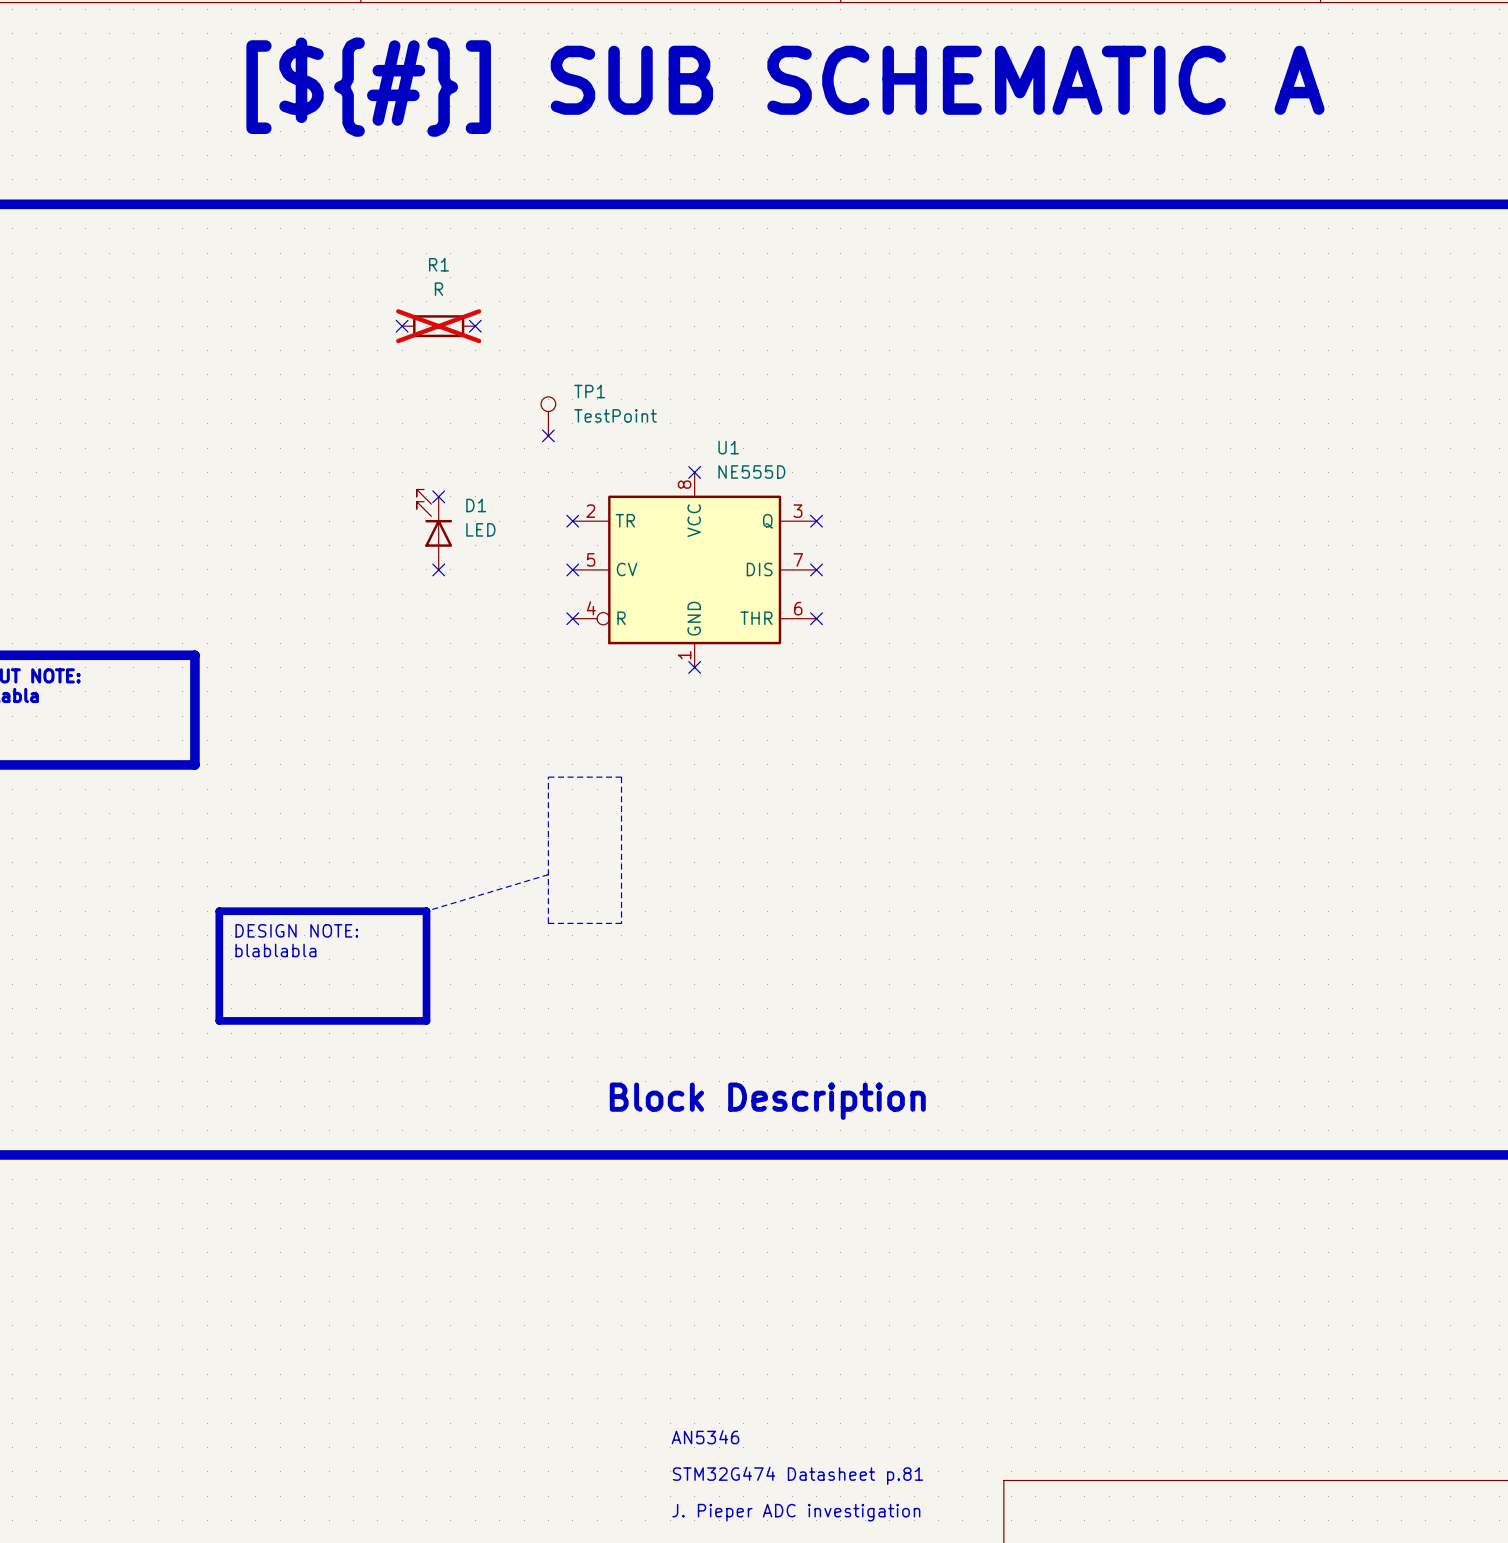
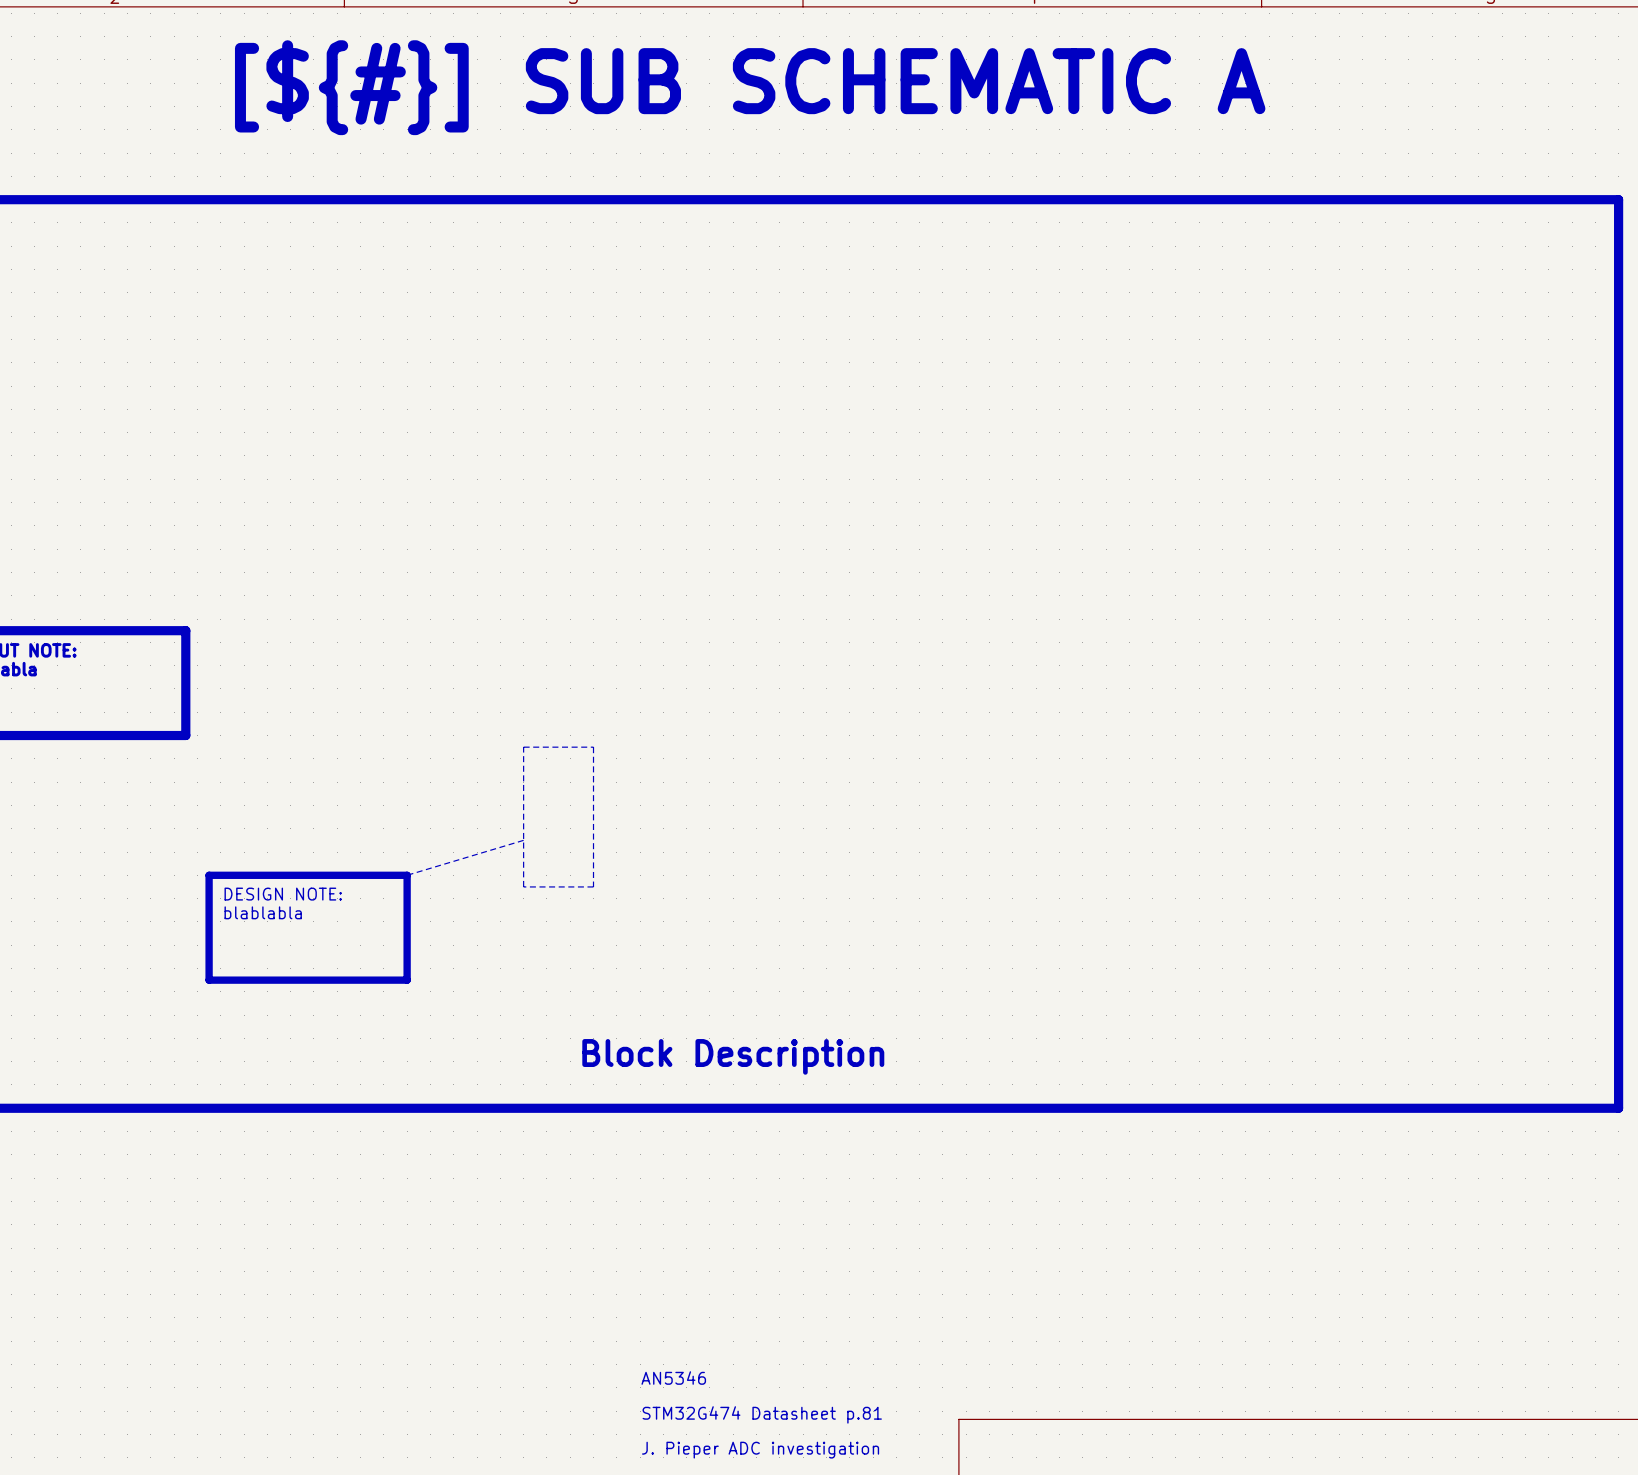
no-connect mark: (402, 326) -> none
R1: R (438, 326) -> none
no-connect mark: (475, 326) -> none
TP1: TestPoint (548, 416) -> none
no-connect mark: (548, 435) -> none
no-connect mark: (694, 472) -> none
no-connect mark: (438, 496) -> none
no-connect mark: (572, 521) -> none
no-connect mark: (816, 521) -> none
D1: LED (434, 529) -> none
no-connect mark: (438, 569) -> none
no-connect mark: (572, 569) -> none
U1: NE555D (694, 569) -> none
no-connect mark: (816, 569) -> none
no-connect mark: (572, 618) -> none
no-connect mark: (816, 618) -> none
no-connect mark: (694, 667) -> none

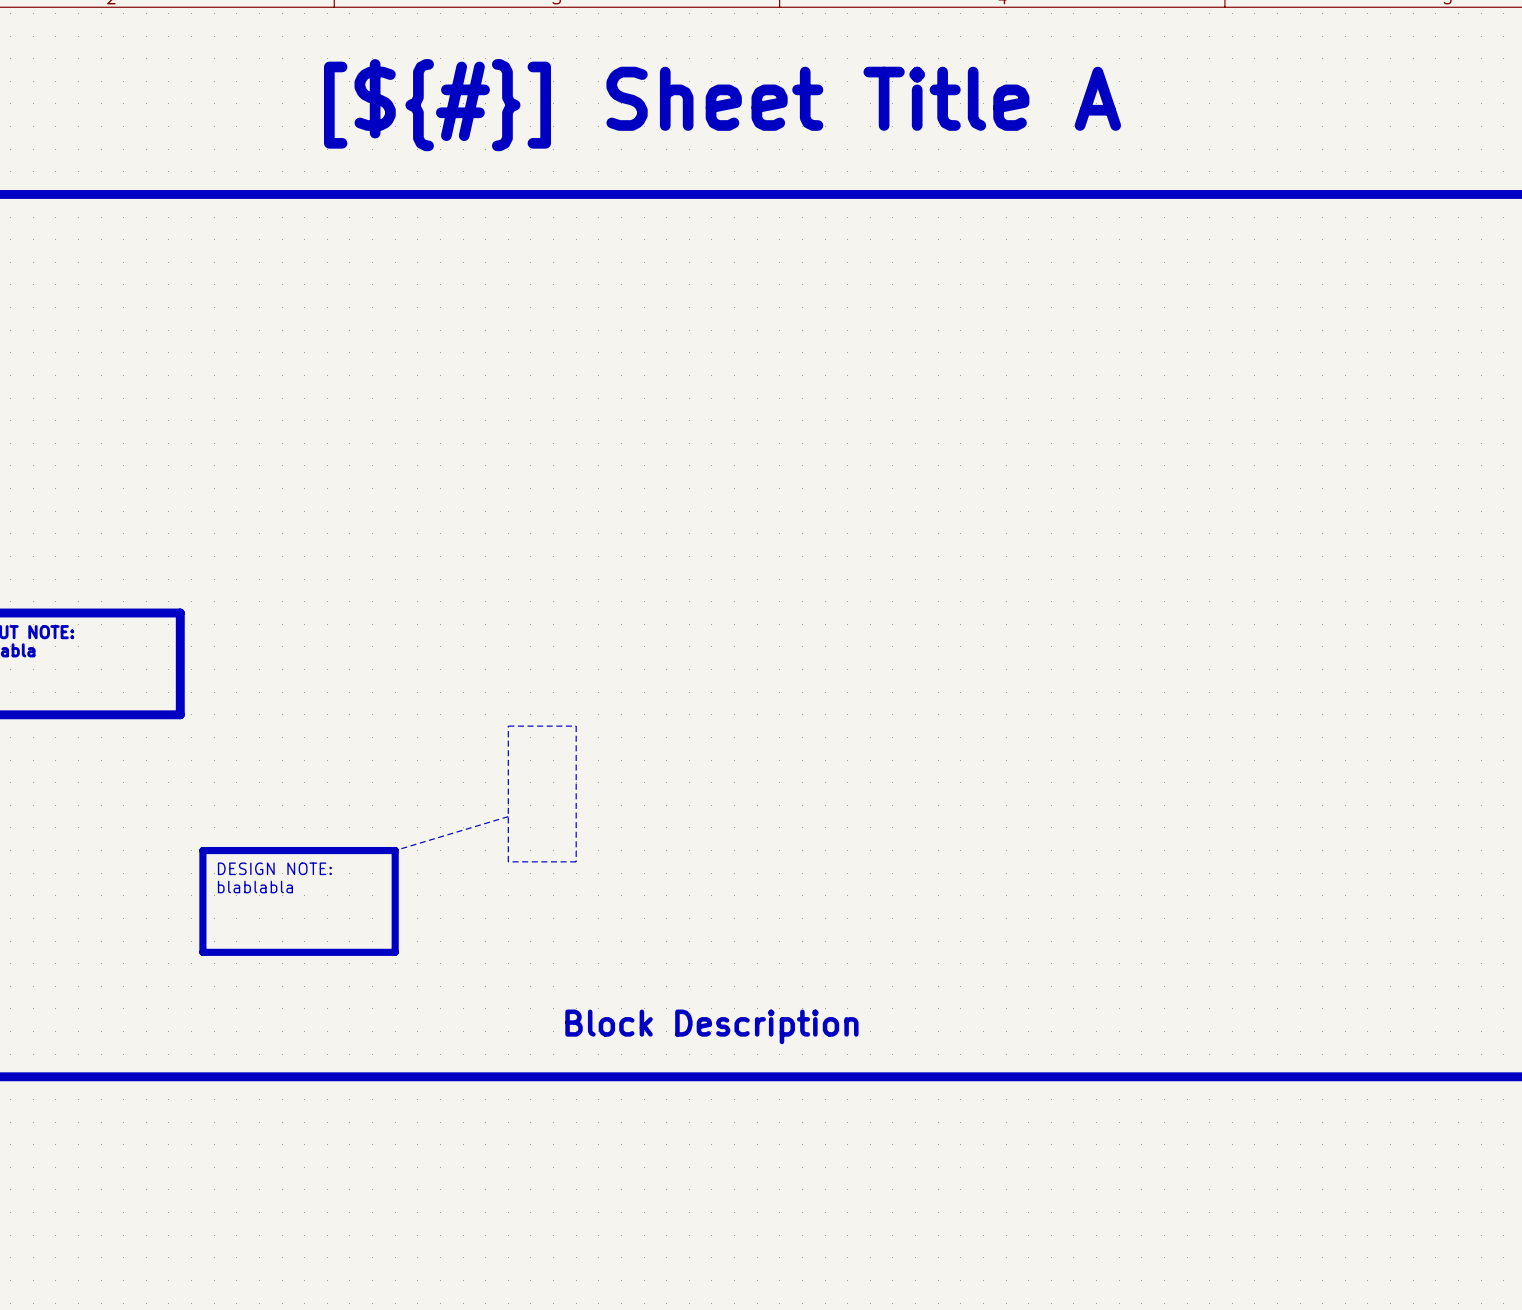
text: [${#}] SUB SCHEMATIC A (750, 87) -> none
text: none -> [${#}] Sheet Title A (722, 105)

